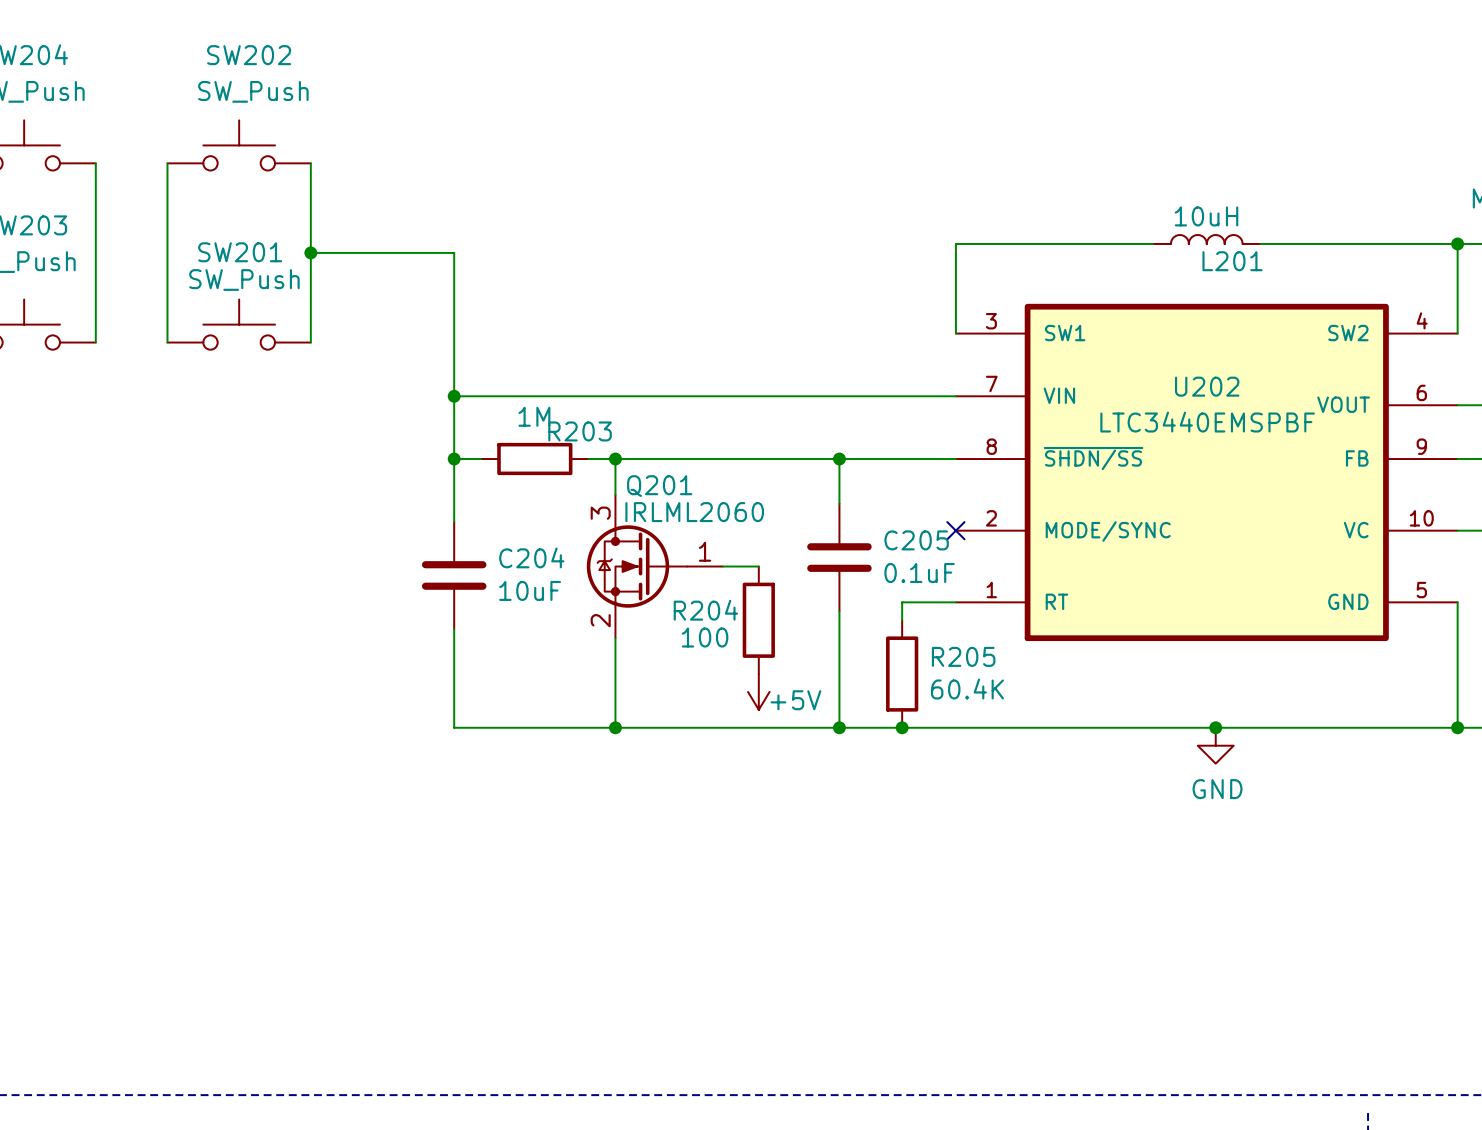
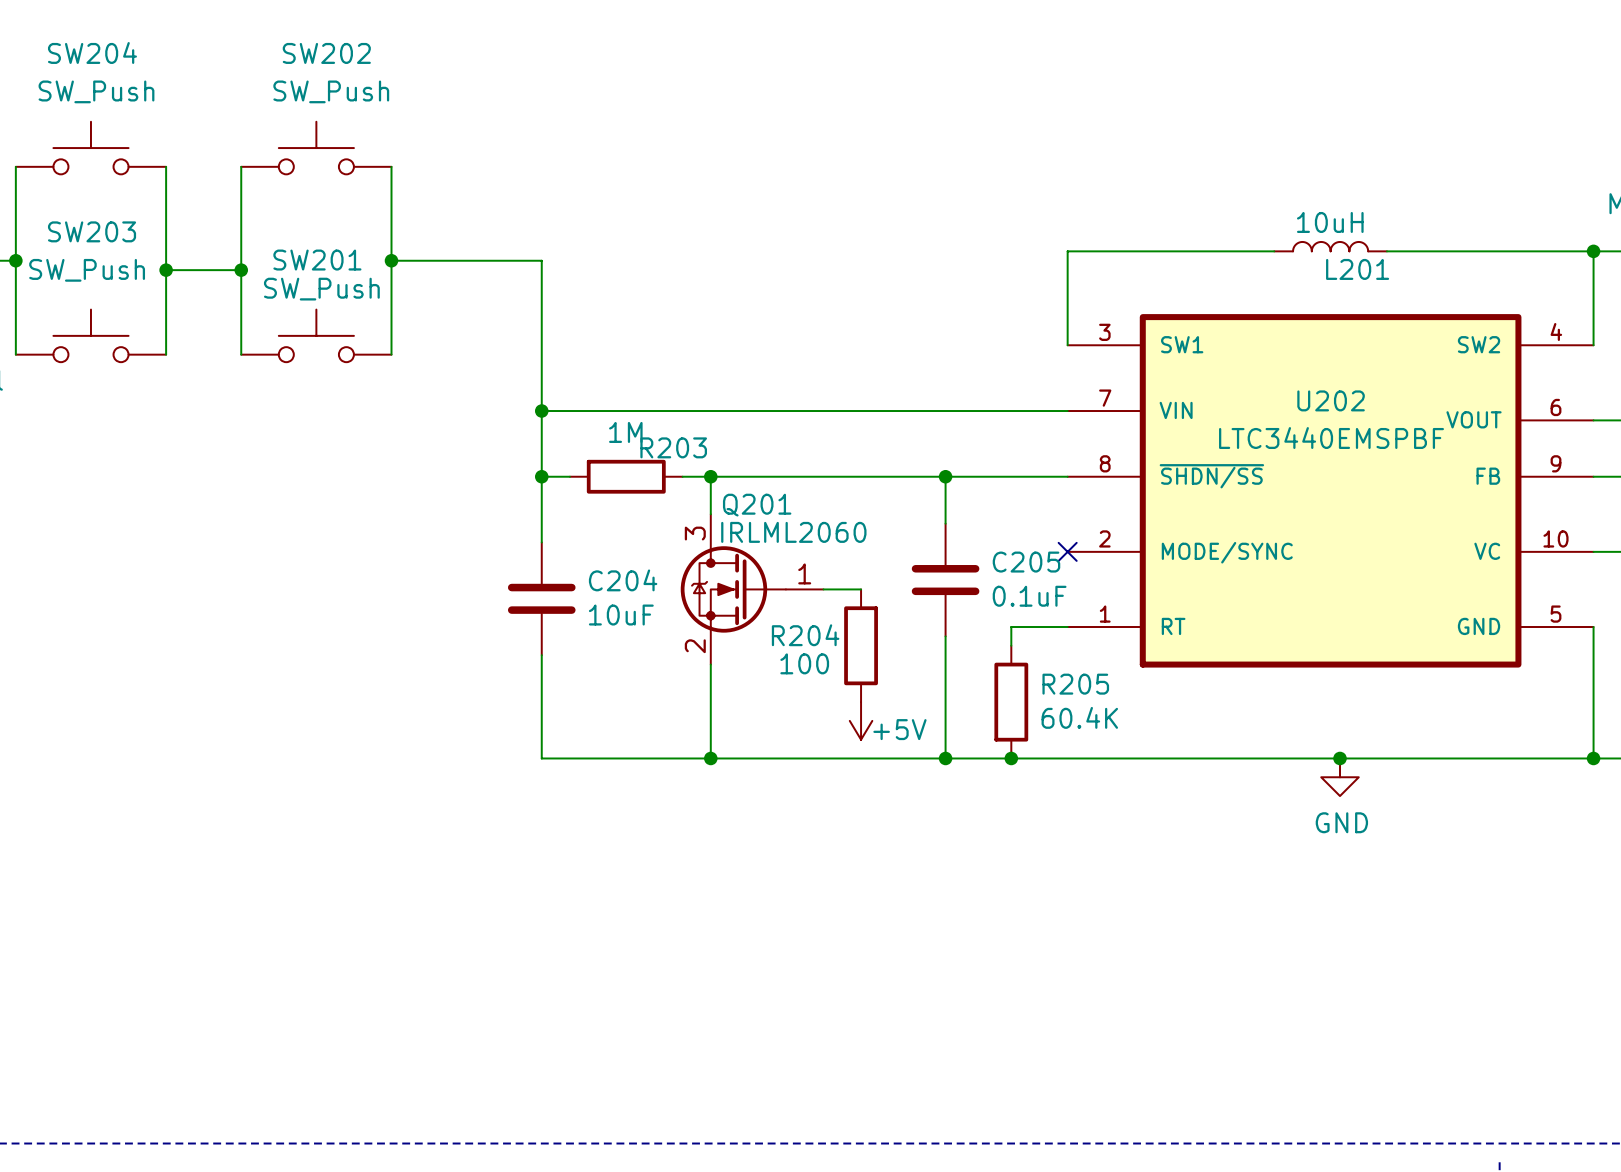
wire: none -> (166, 270) (241, 270)
junction: none -> (166, 270)
junction: none -> (241, 270)

